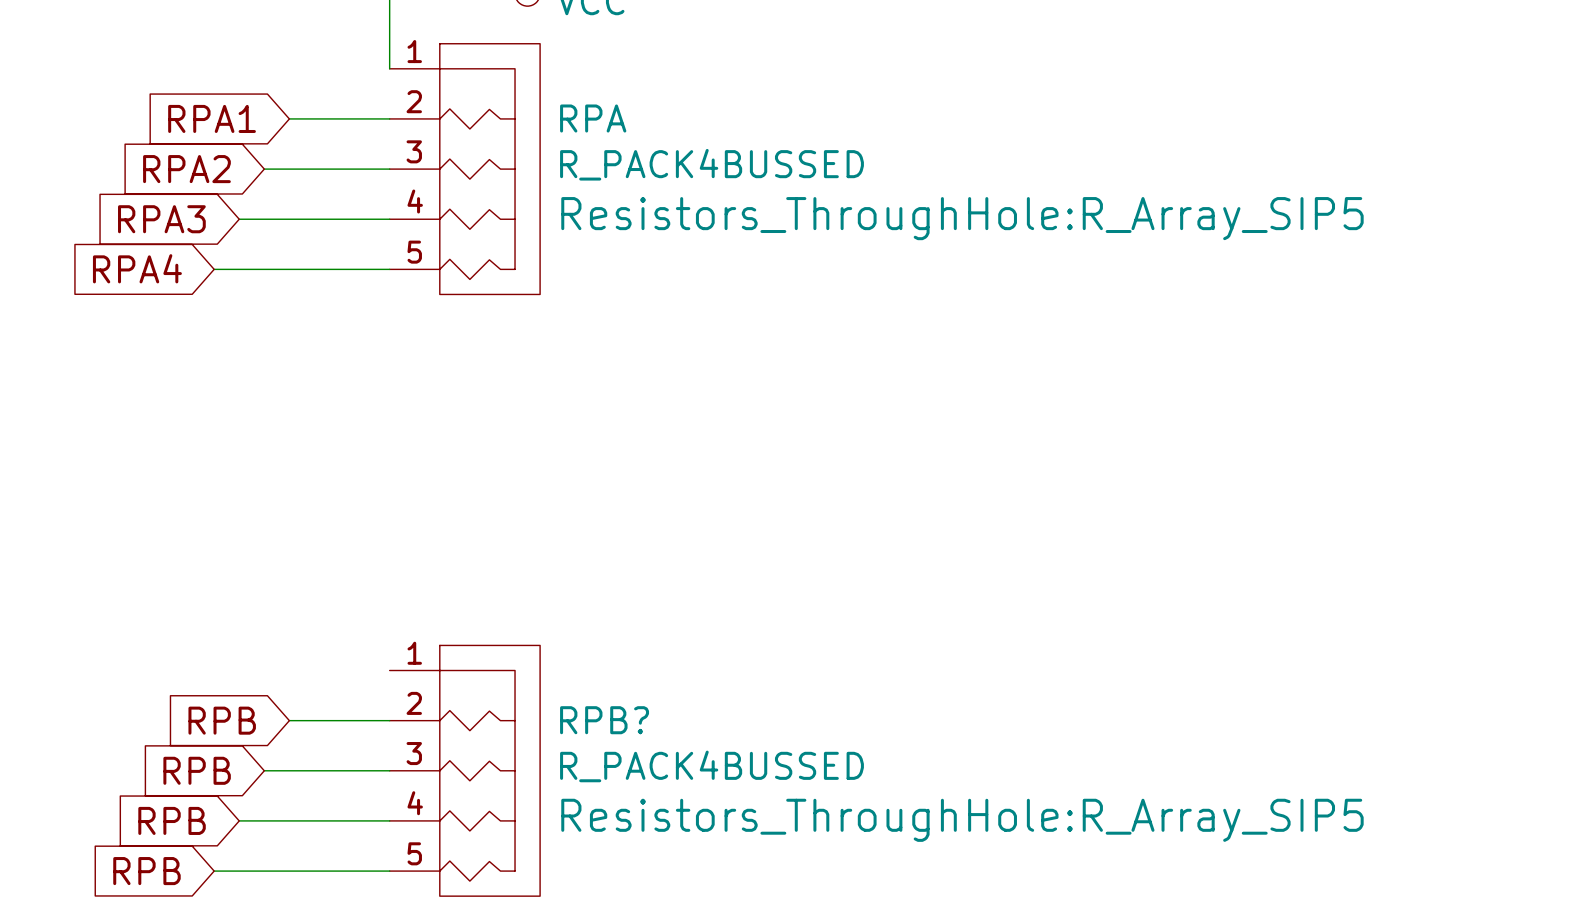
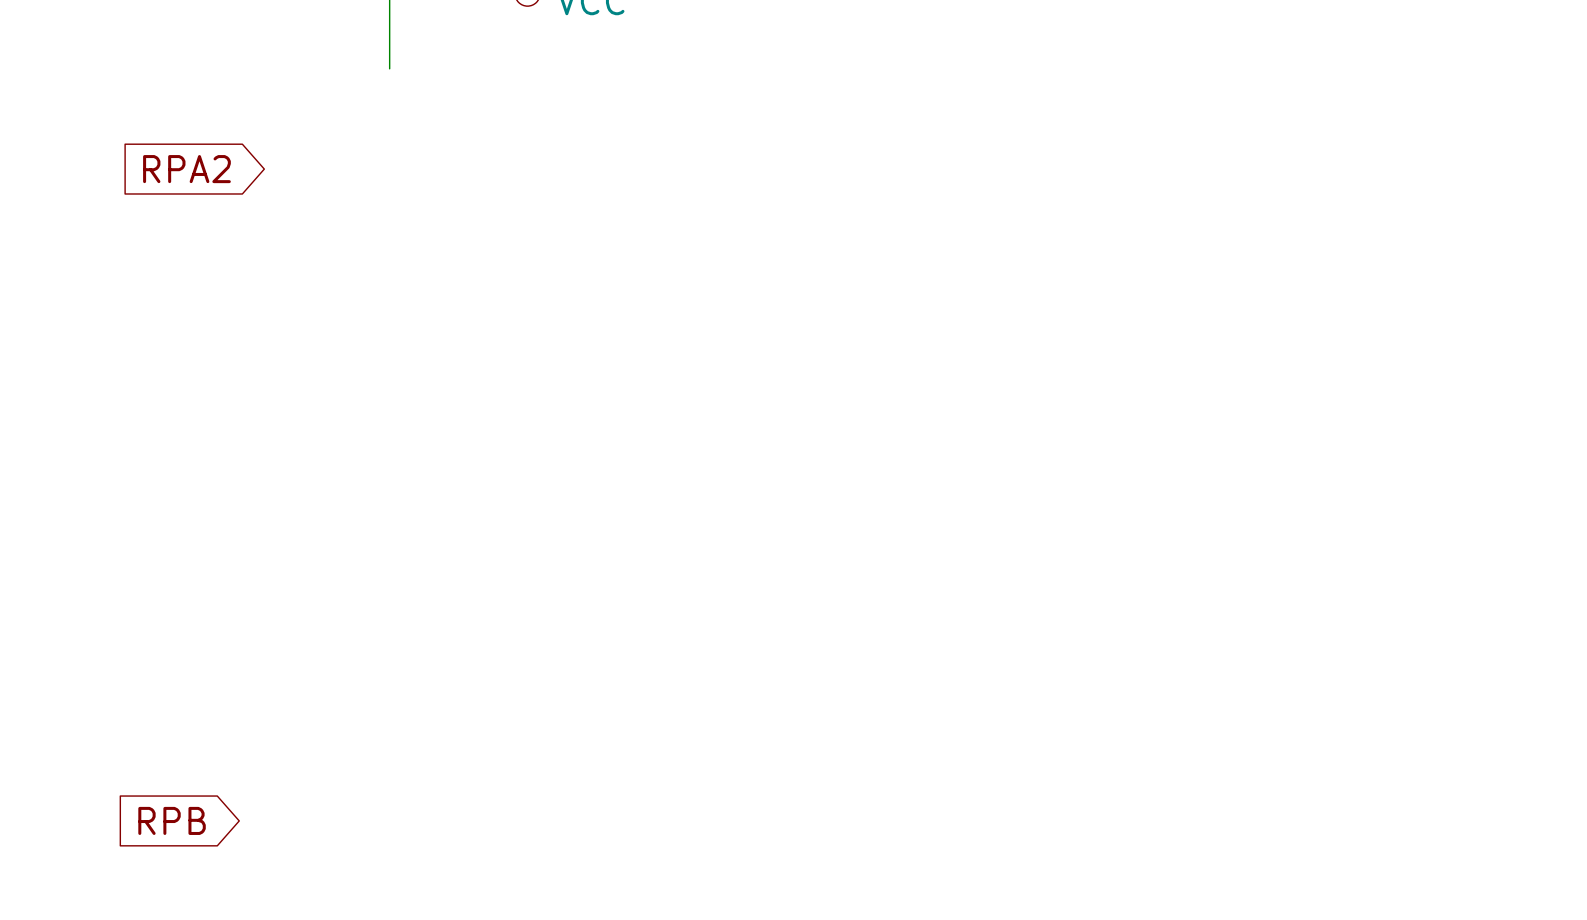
global label: RPA1 (212, 118) -> none
wire: (289, 118) (389, 118) -> none
wire: (264, 169) (389, 169) -> none
RPA: R_PACK4BUSSED (464, 169) -> none
global label: RPA3 (161, 219) -> none
wire: (239, 219) (389, 219) -> none
global label: RPA4 (137, 268) -> none
wire: (214, 269) (389, 269) -> none
global label: RPB (222, 720) -> none
wire: (289, 720) (389, 720) -> none
global label: RPB (197, 770) -> none
wire: (264, 770) (389, 770) -> none
RPB?: R_PACK4BUSSED (464, 770) -> none
wire: (239, 820) (389, 820) -> none
global label: RPB (146, 871) -> none
wire: (214, 871) (389, 871) -> none

